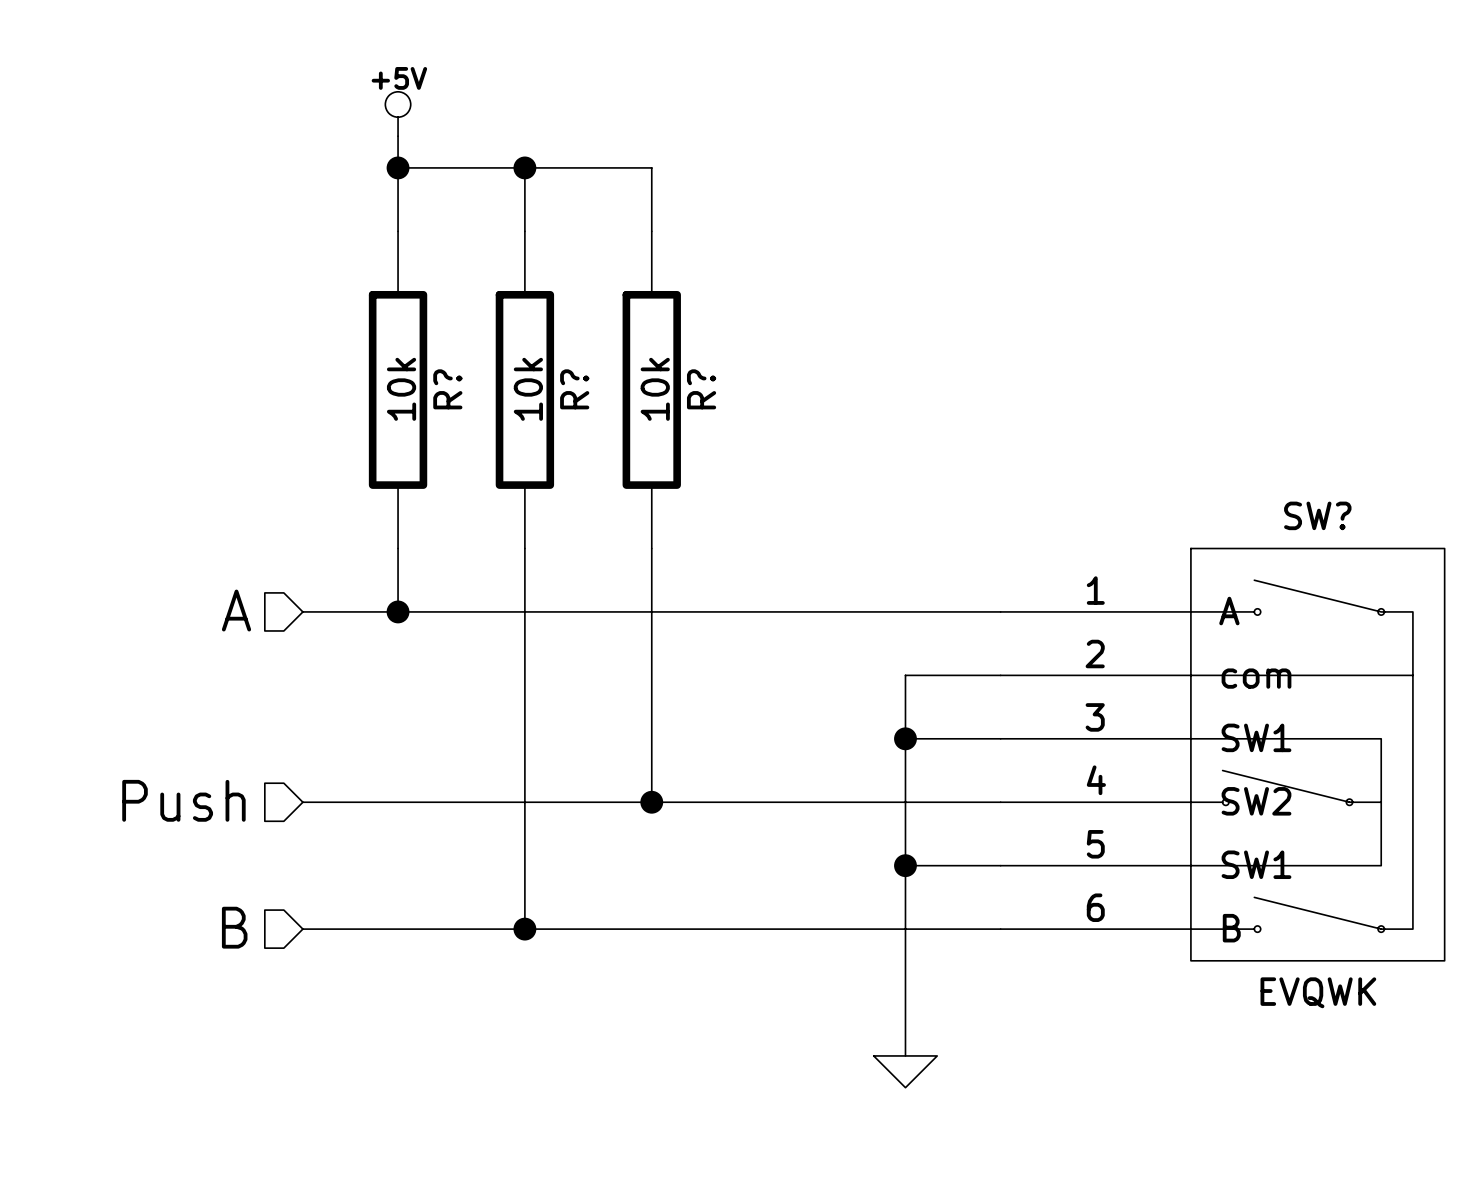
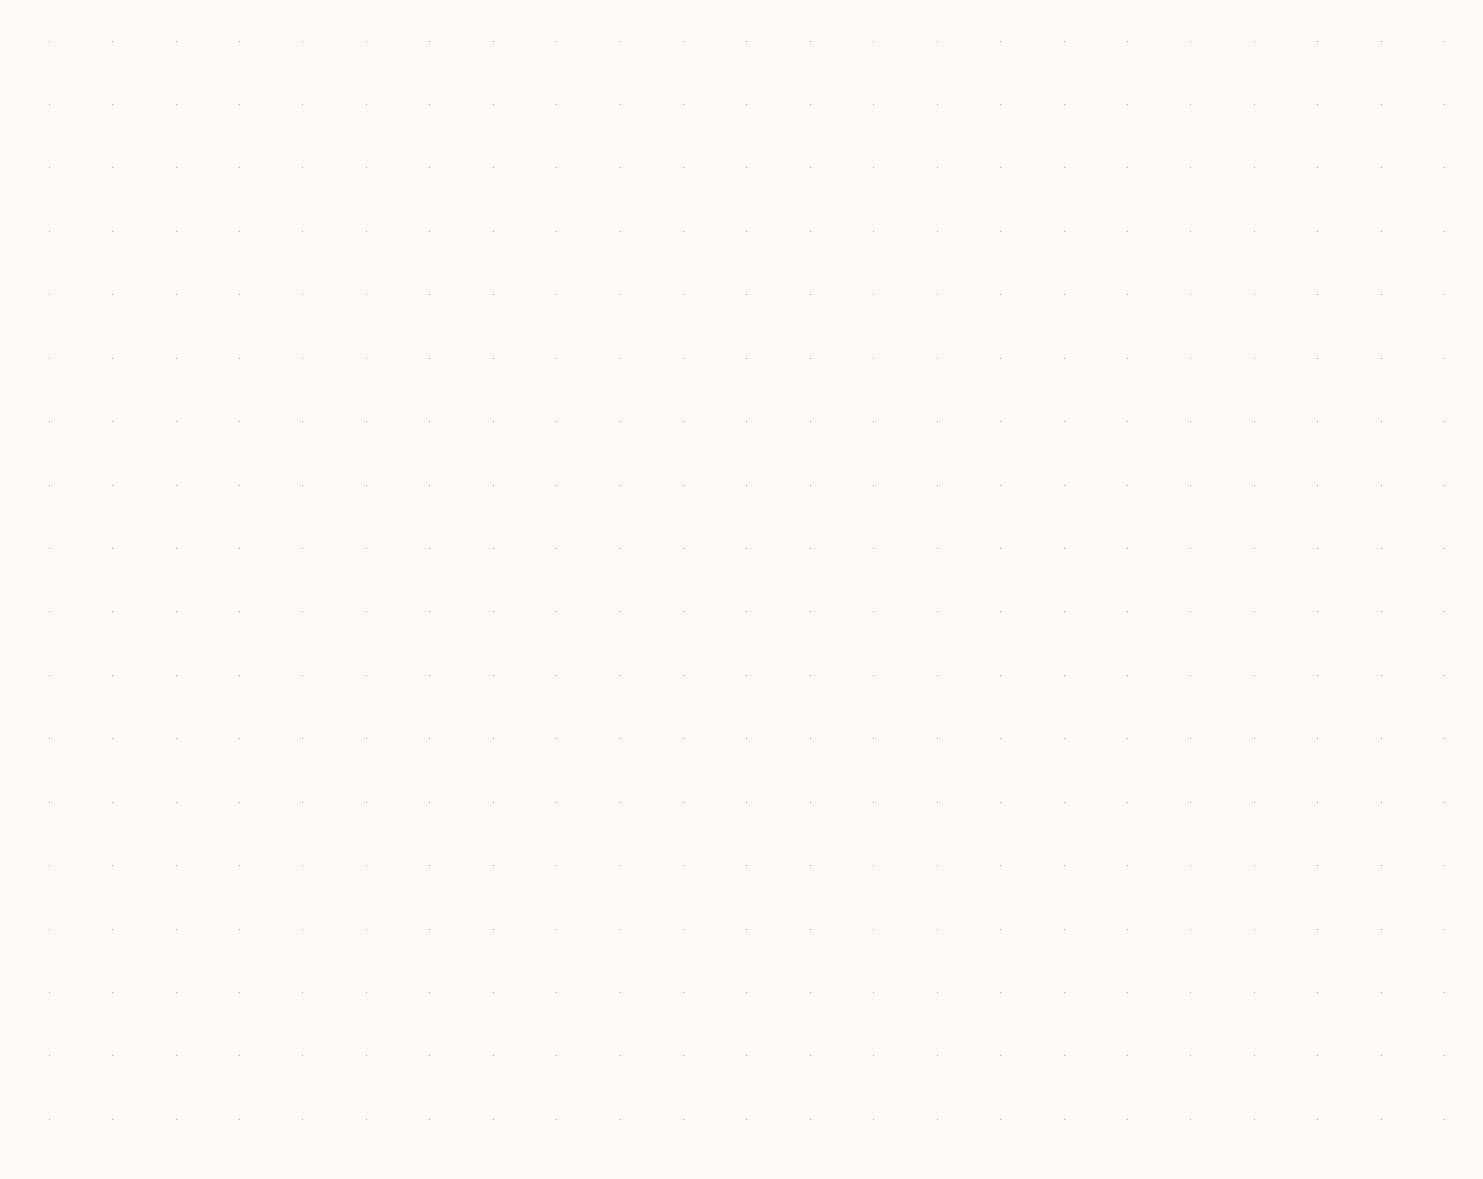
power symbol: +5V (398, 114) -> none
wire: (398, 136) (398, 231) -> none
wire: (398, 167) (651, 167) (651, 231) -> none
junction: (398, 167) -> none
wire: (524, 167) (524, 231) -> none
junction: (524, 167) -> none
R?: 10k (398, 389) -> none
R?: 10k (524, 389) -> none
R?: 10k (651, 389) -> none
wire: (398, 548) (398, 611) -> none
wire: (524, 548) (524, 929) -> none
wire: (651, 548) (651, 802) -> none
hierarchical label: A (236, 610) -> none
wire: (302, 611) (1000, 611) -> none
junction: (398, 611) -> none
wire: (1000, 675) (905, 675) (905, 1055) -> none
wire: (905, 738) (1000, 738) -> none
junction: (905, 738) -> none
SW?: EVQWK (1222, 754) -> none
hierarchical label: Push (183, 800) -> none
wire: (302, 802) (1000, 802) -> none
junction: (651, 802) -> none
wire: (905, 865) (1000, 865) -> none
junction: (905, 865) -> none
hierarchical label: B (234, 927) -> none
wire: (302, 929) (1000, 929) -> none
junction: (524, 929) -> none
power symbol: (905, 1071) -> none

